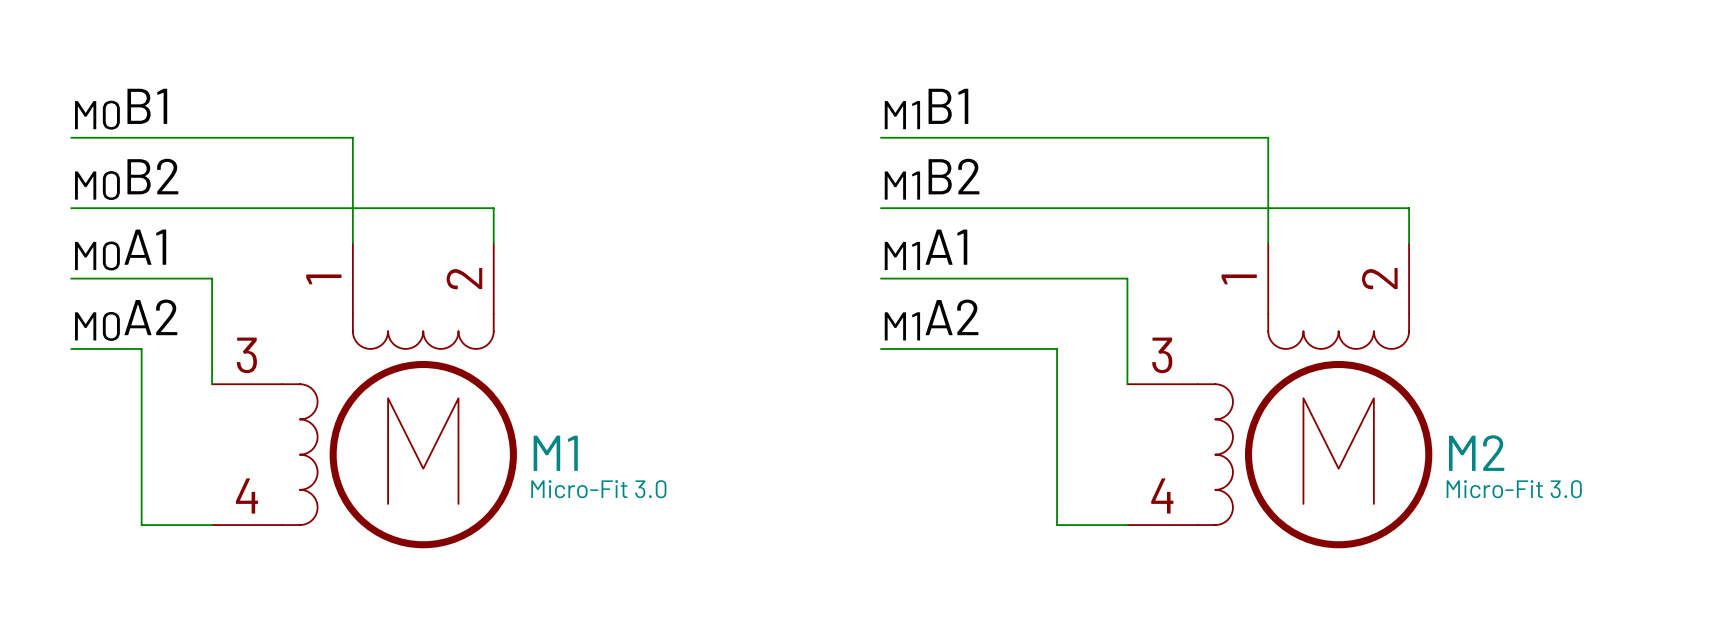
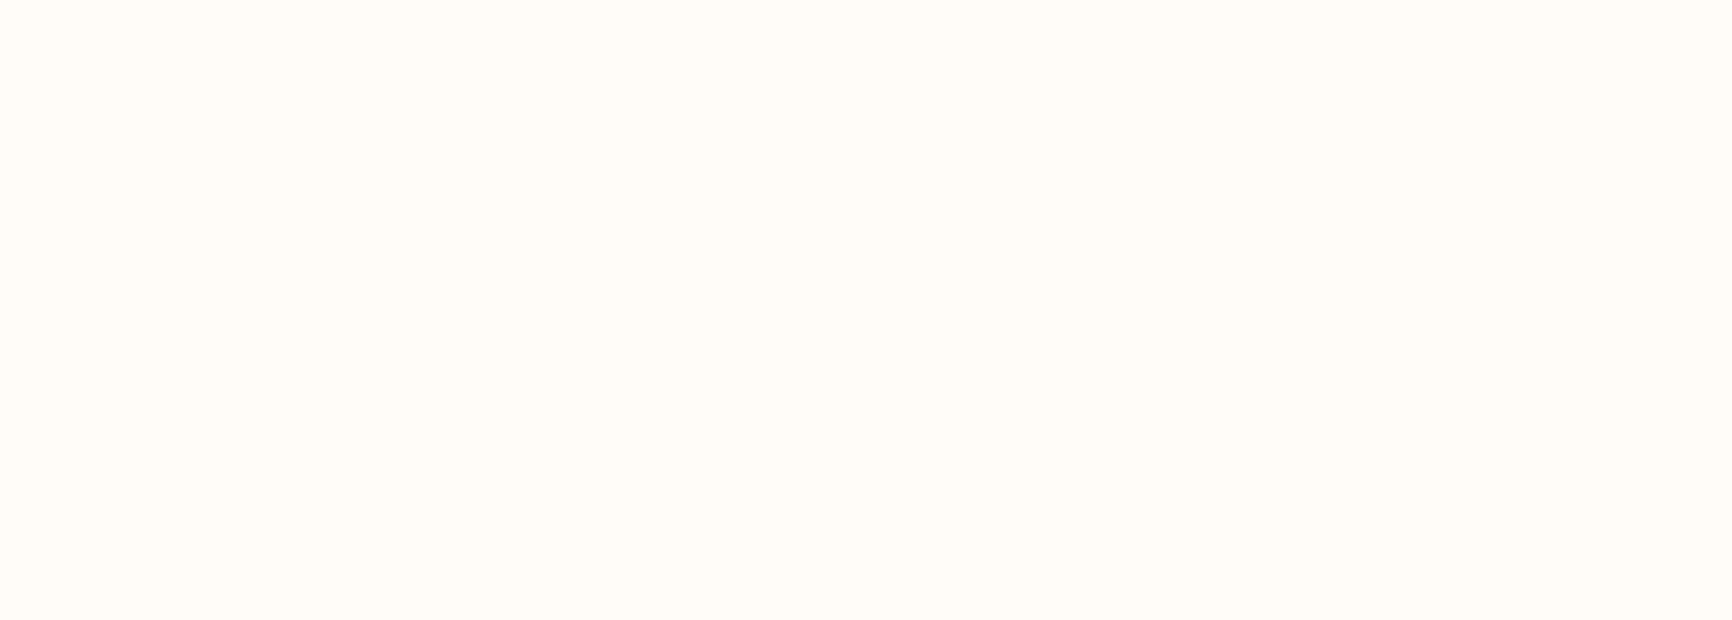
label: M1B1 (926, 108) -> none
label: M0B1 (121, 109) -> none
wire: (71, 137) (352, 137) (352, 243) -> none
wire: (880, 137) (1268, 137) (1268, 243) -> none
label: M0B2 (126, 179) -> none
label: M1B2 (932, 179) -> none
wire: (71, 208) (493, 208) (493, 243) -> none
wire: (880, 208) (1409, 208) (1409, 243) -> none
label: M1A1 (926, 249) -> none
label: M0A1 (120, 250) -> none
wire: (71, 278) (212, 278) (212, 384) -> none
wire: (880, 278) (1127, 278) (1127, 384) -> none
label: M0A2 (126, 320) -> none
label: M1A2 (931, 320) -> none
wire: (71, 349) (141, 349) (141, 525) (212, 525) -> none
wire: (880, 349) (1057, 349) (1057, 525) (1127, 525) -> none
M1: Micro-Fit 3.0 (364, 395) -> none
M2: Micro-Fit 3.0 (1279, 395) -> none

